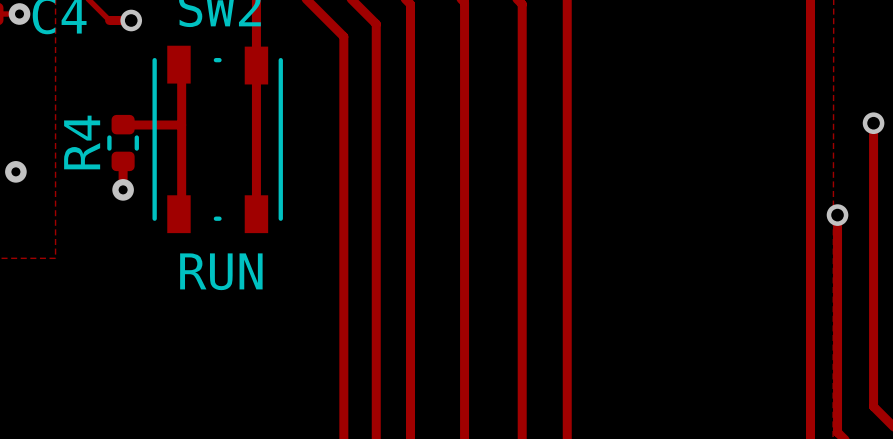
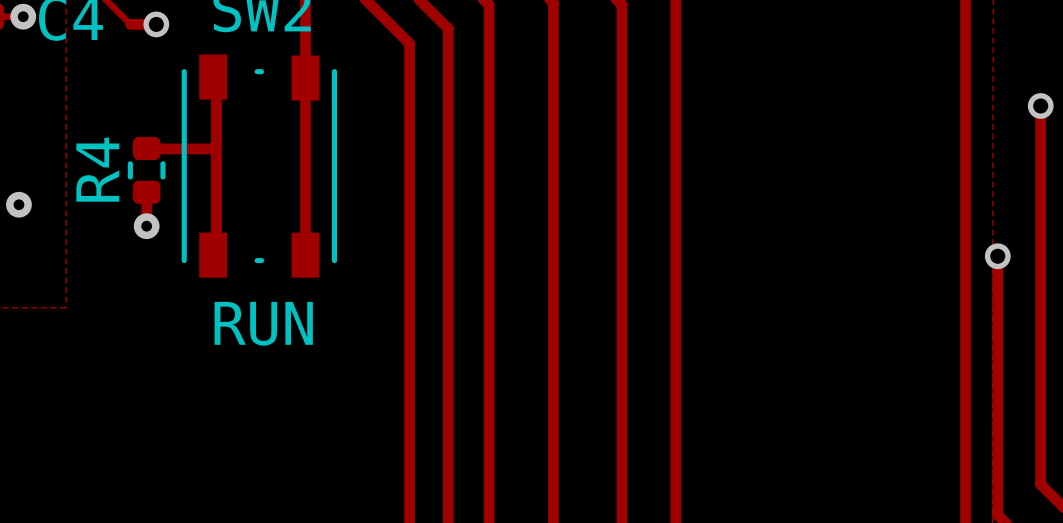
track: none -> (1040, 105) (1040, 146)
via: none -> (1040, 105)
via: (873, 123) -> none

